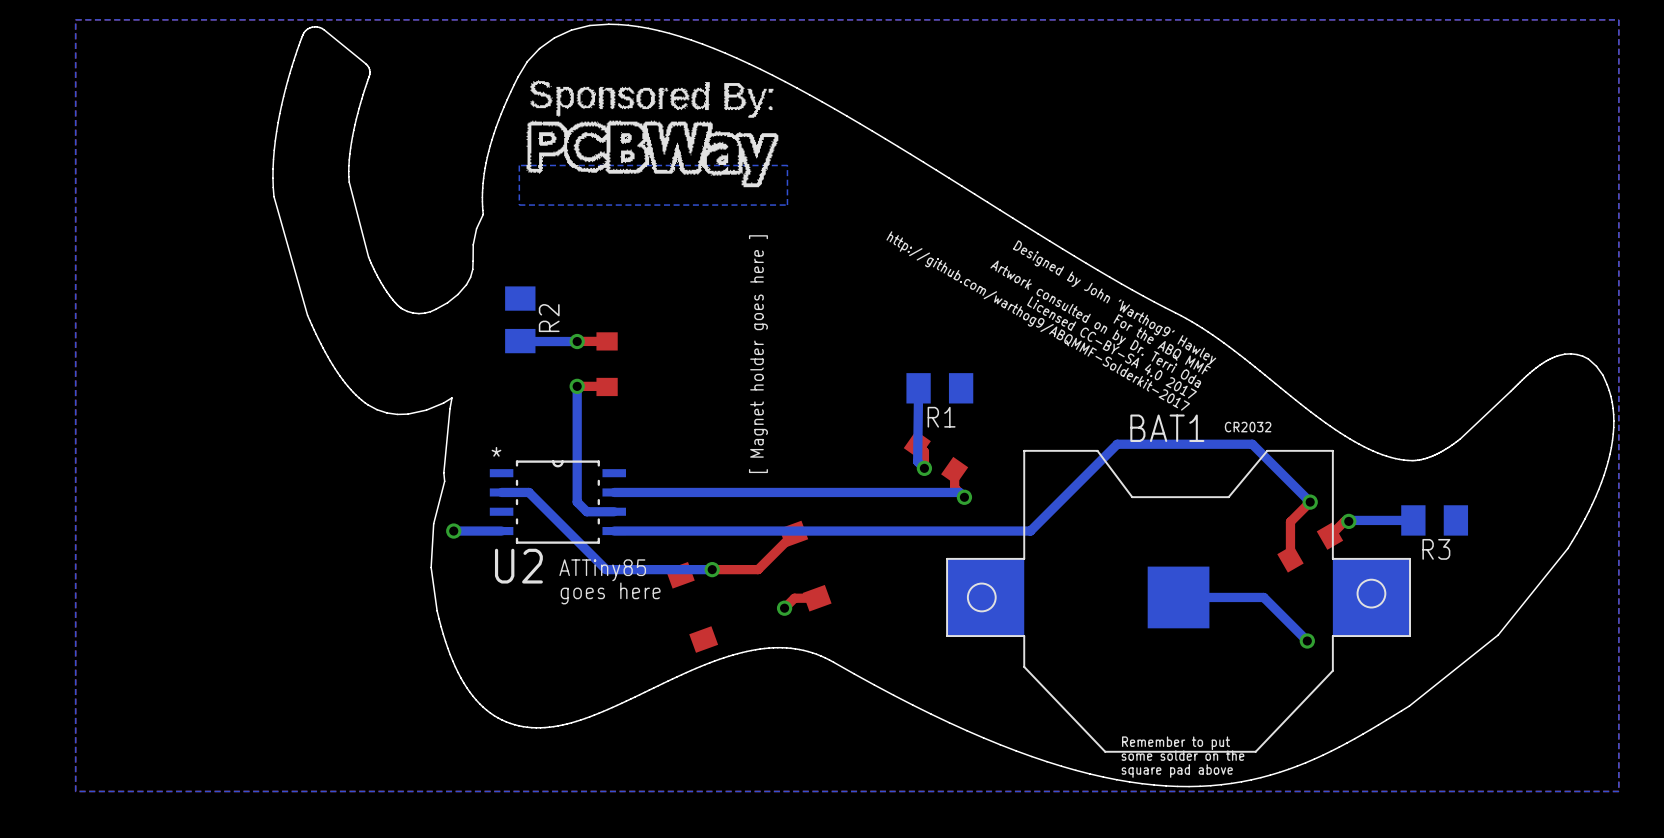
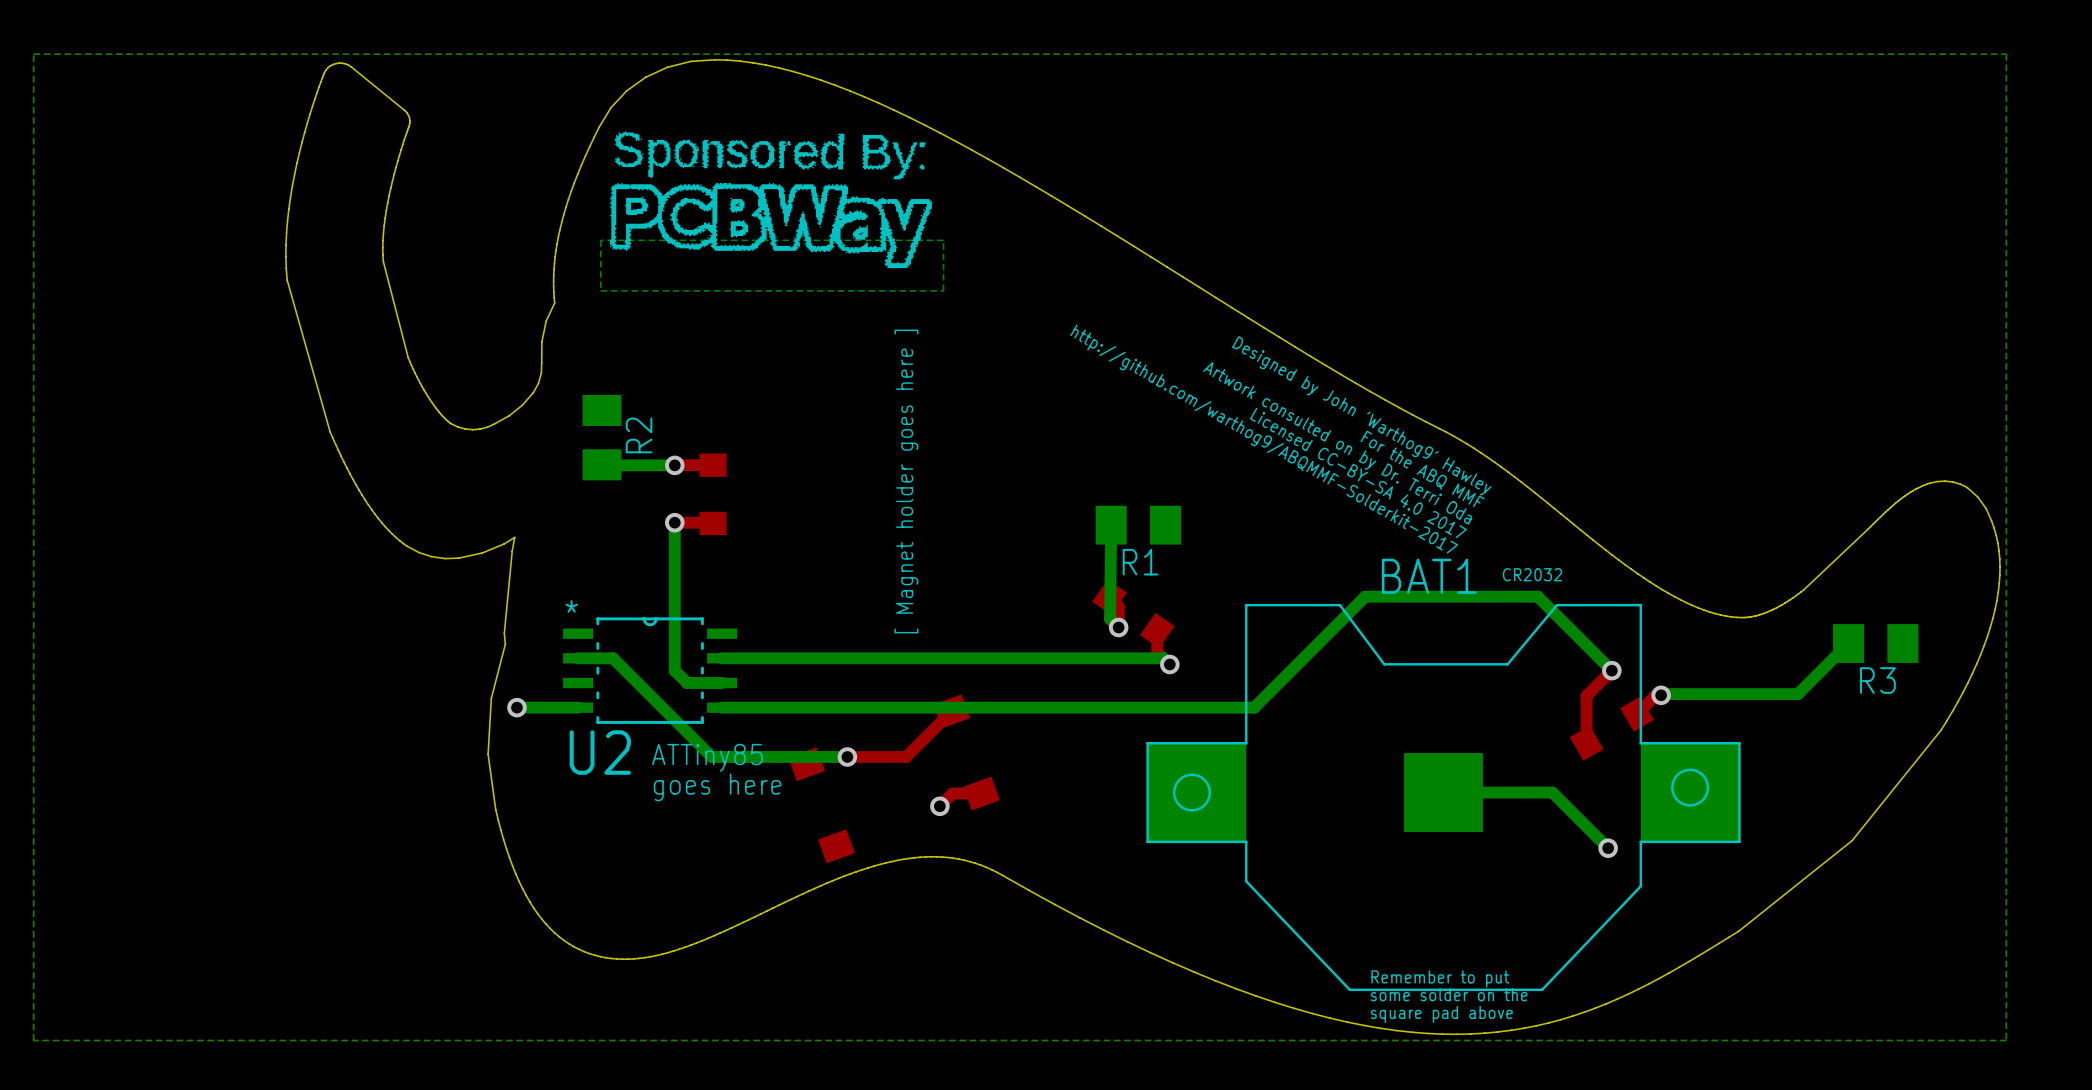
bottom track: none -> (1848, 643) (1797, 694) (1743, 694)
R3 position: (1434, 520) -> (1875, 643)

